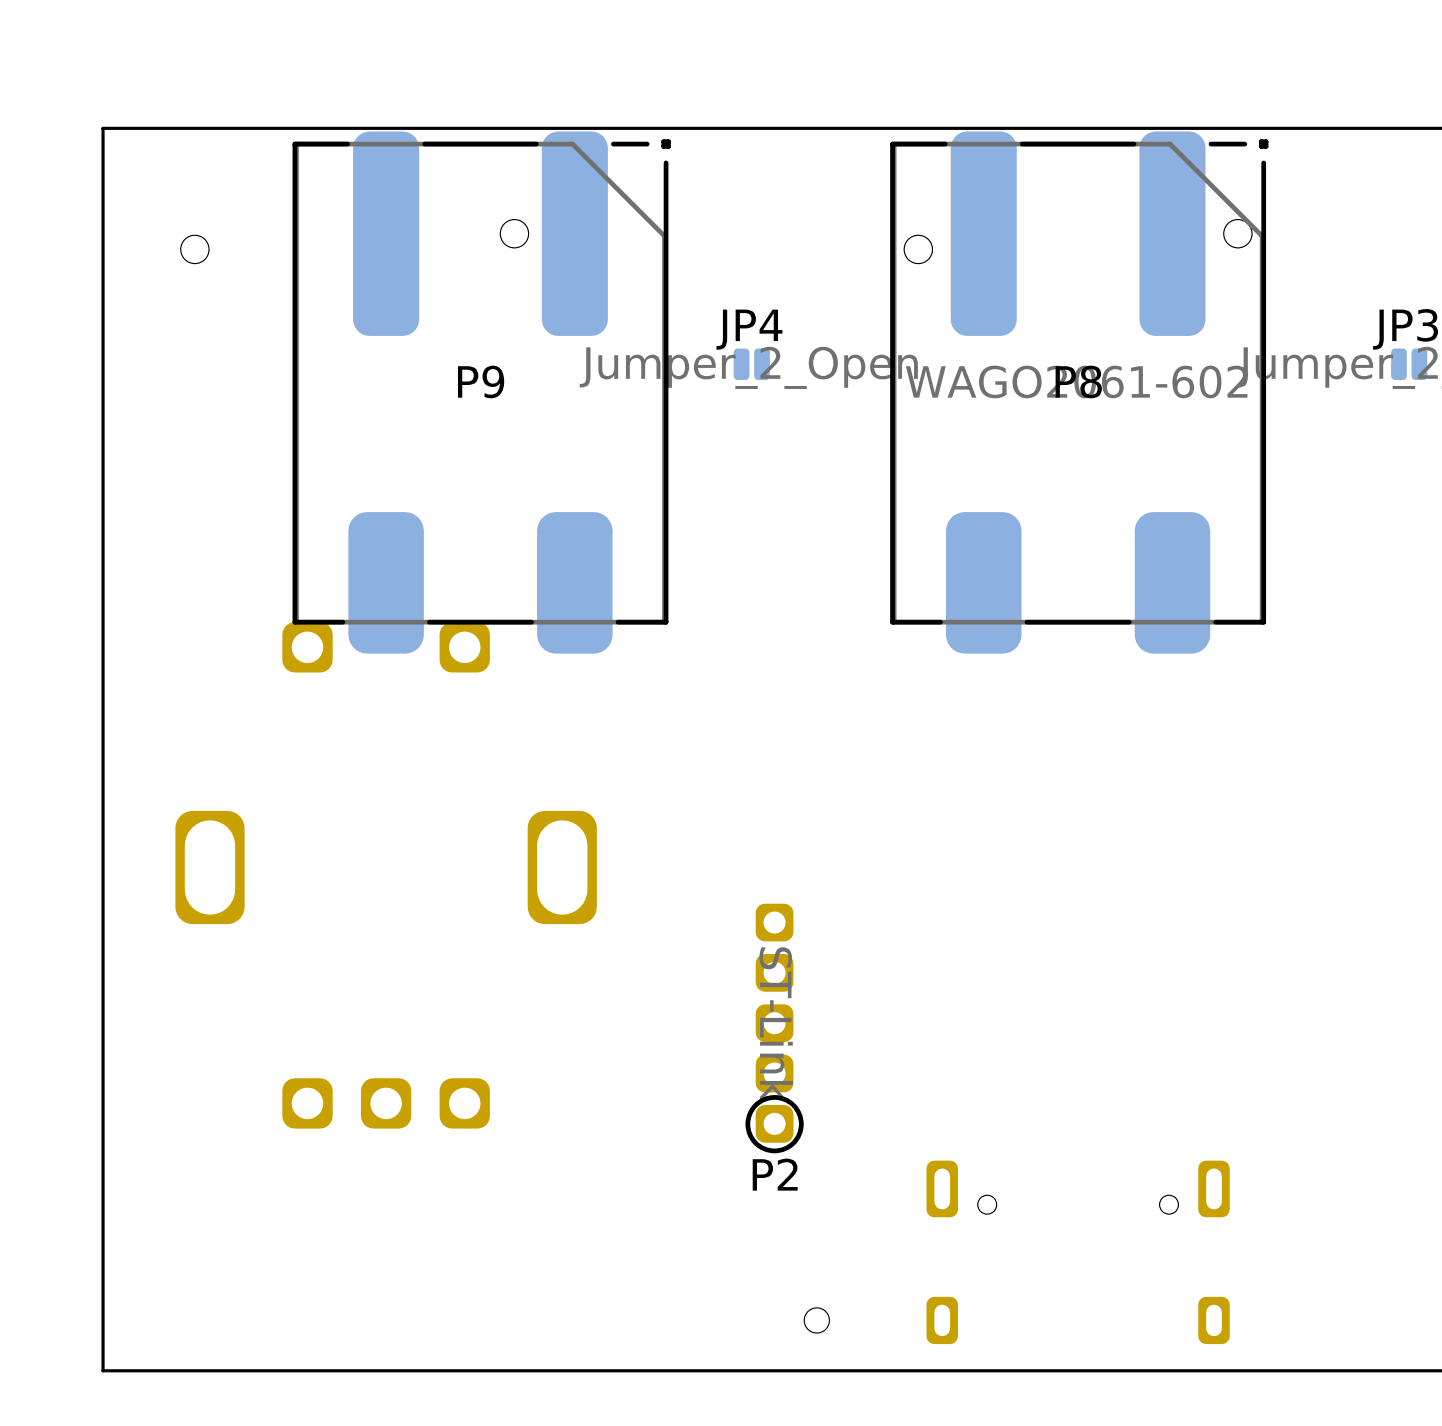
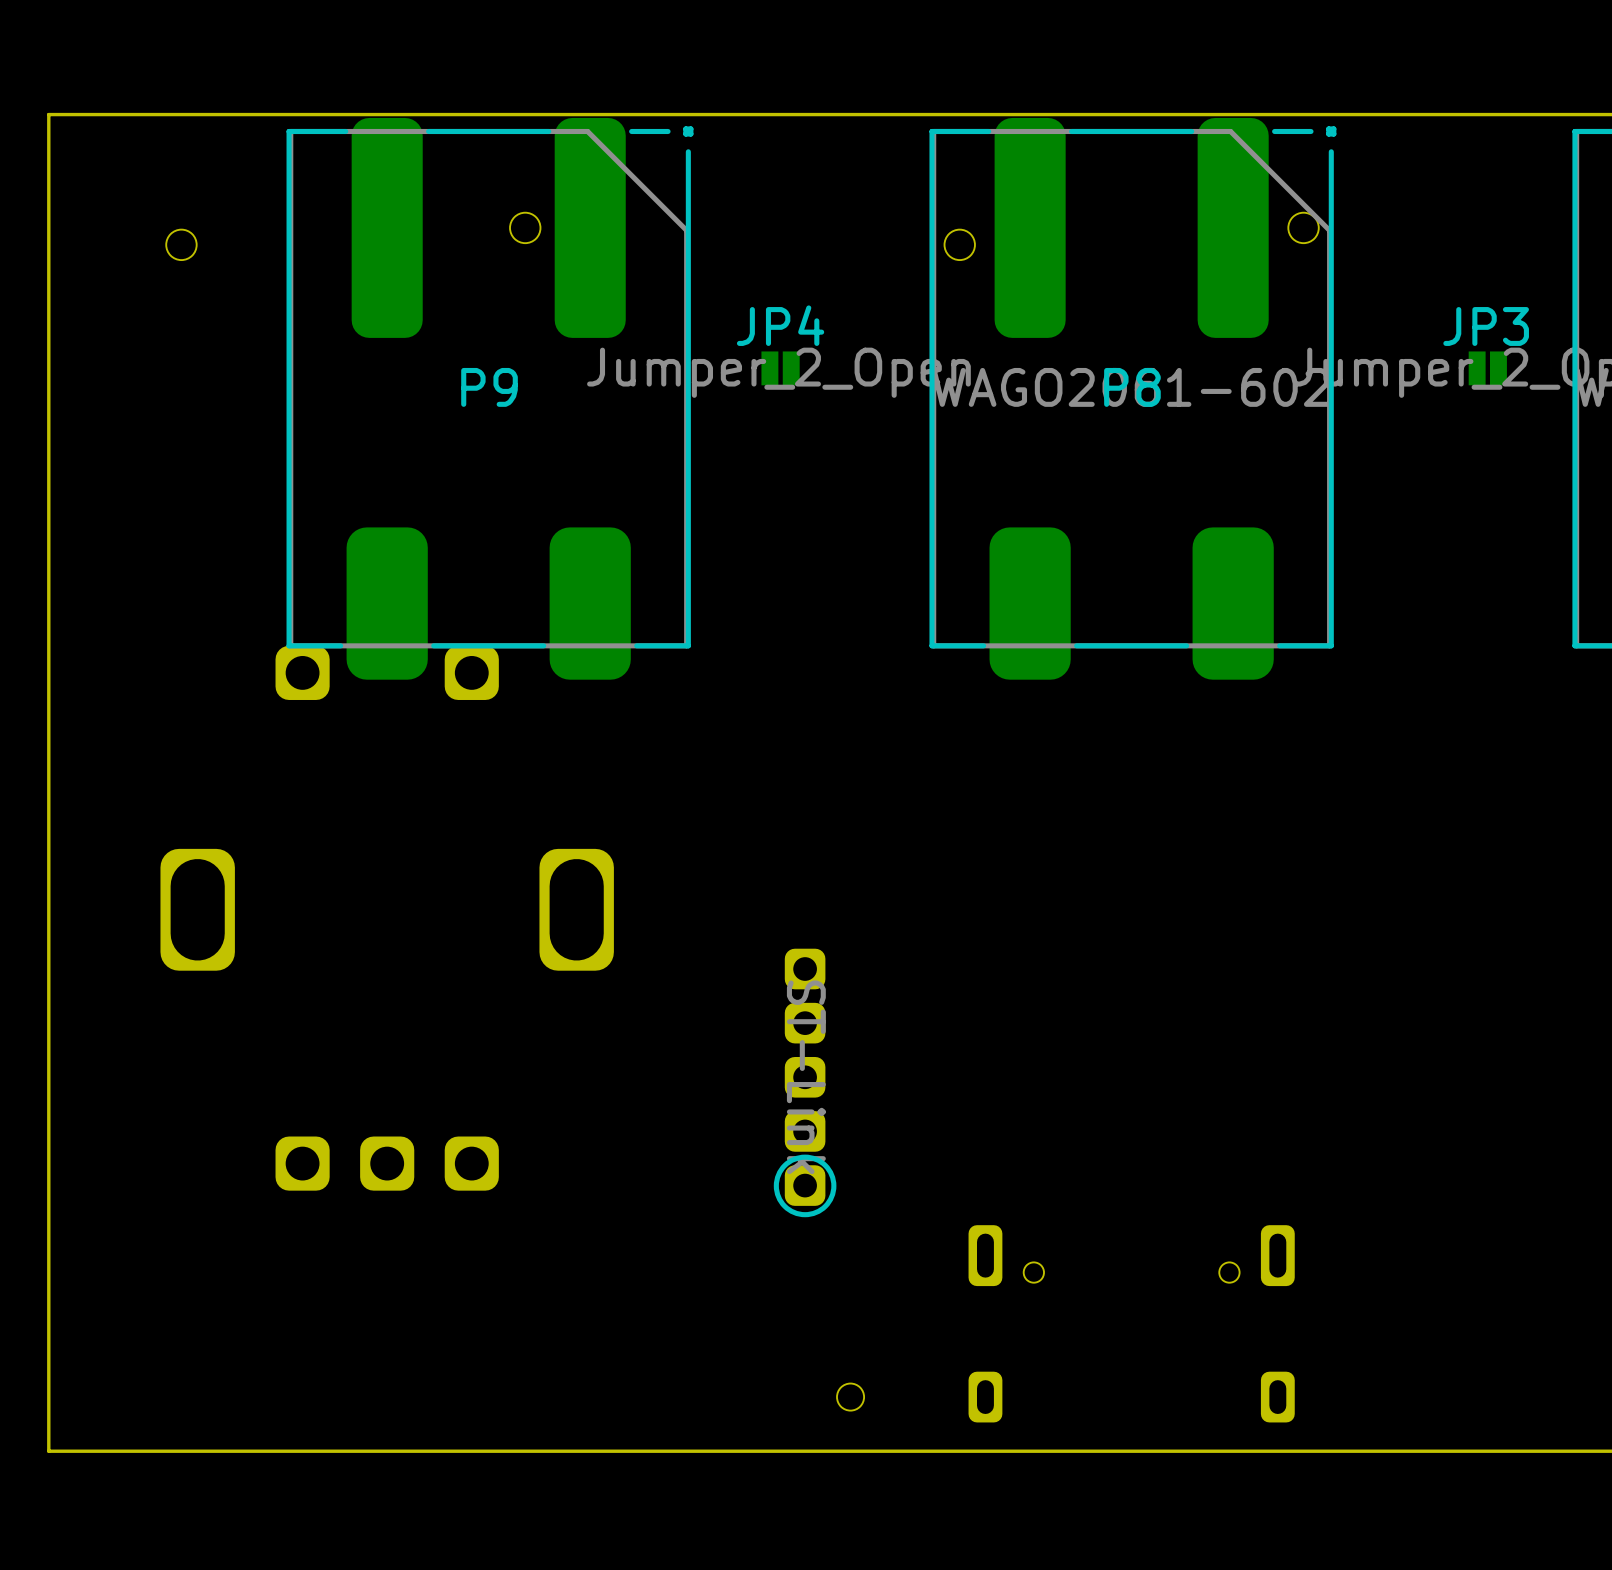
board edge: (103, 128) (103, 1370) -> (82, 114) (48, 114) (48, 1451) (82, 1451)
JP4 footprint: [733, 348, 770, 380] -> [761, 351, 800, 386]
JP3 footprint: [1391, 348, 1428, 380] -> [1468, 351, 1507, 386]
P2 name: P2 (775, 1174) -> none

